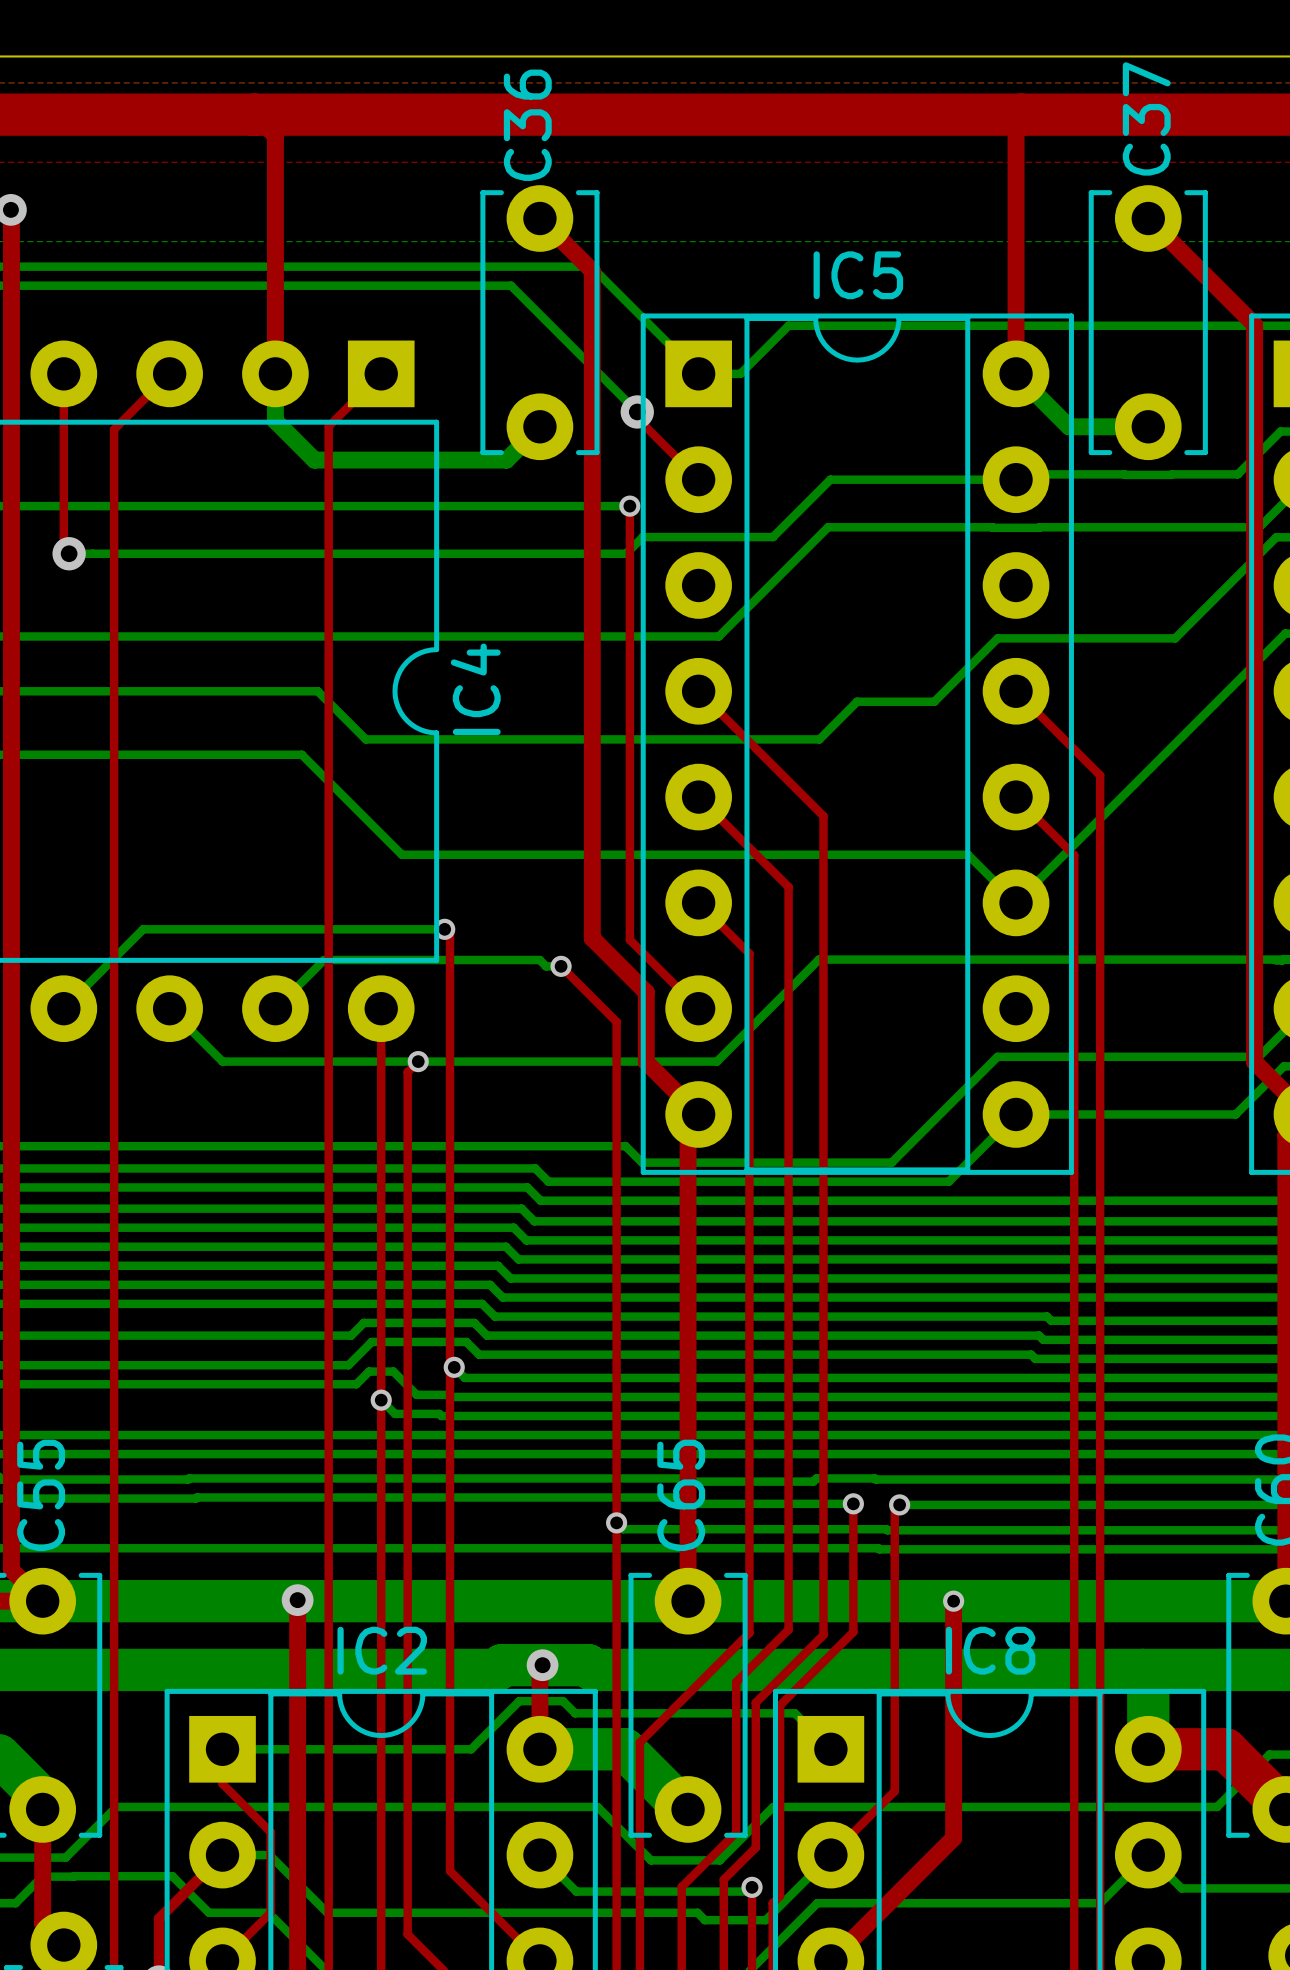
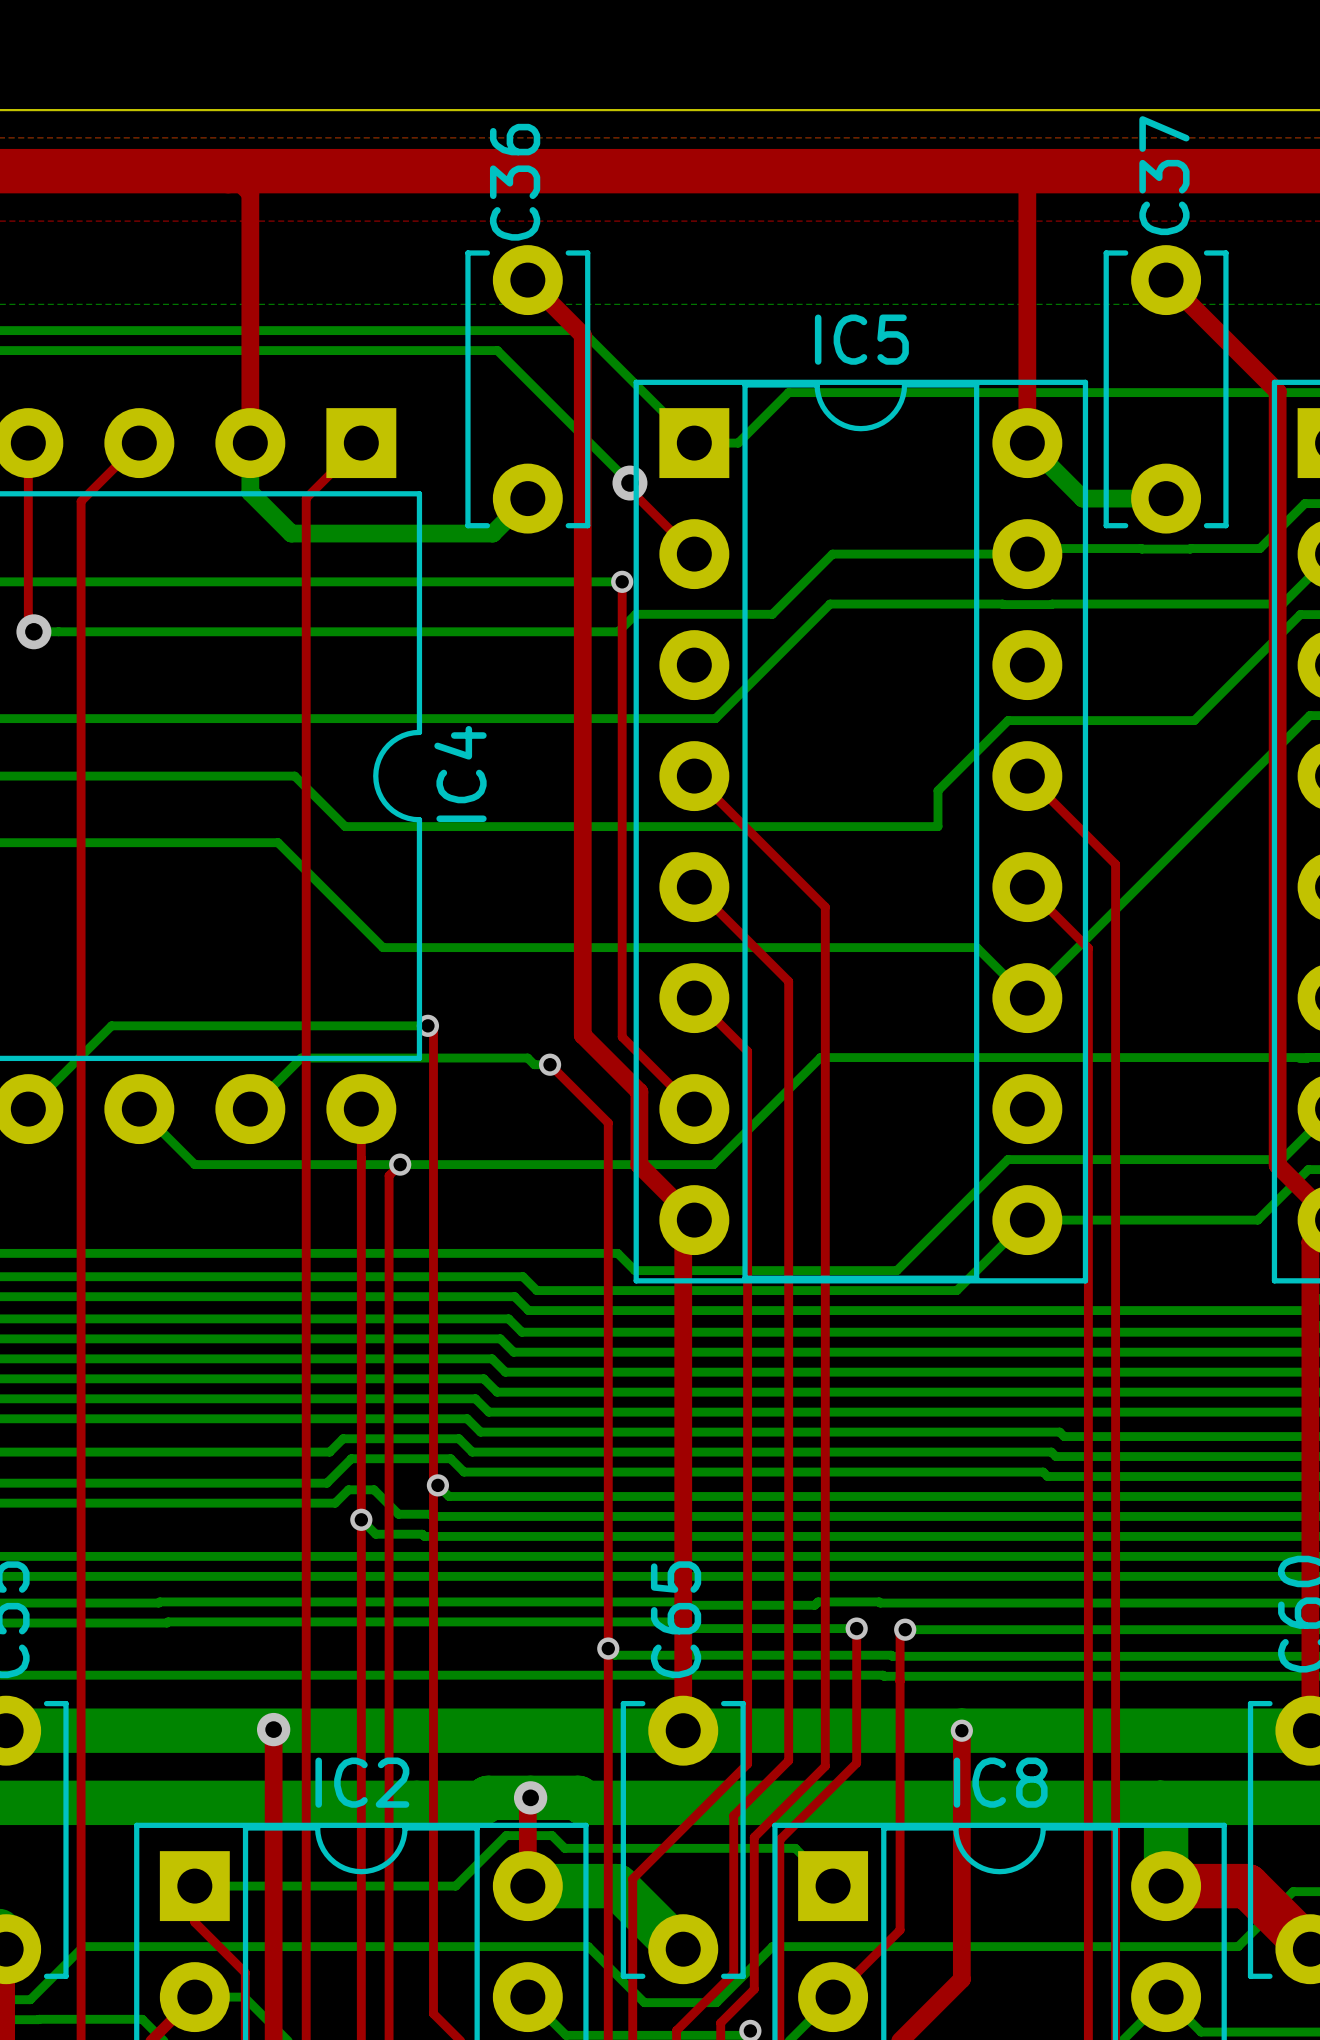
bottom track: (934, 701) (857, 701) (819, 739) -> (941, 787) (937, 790) (937, 826) (821, 826)

